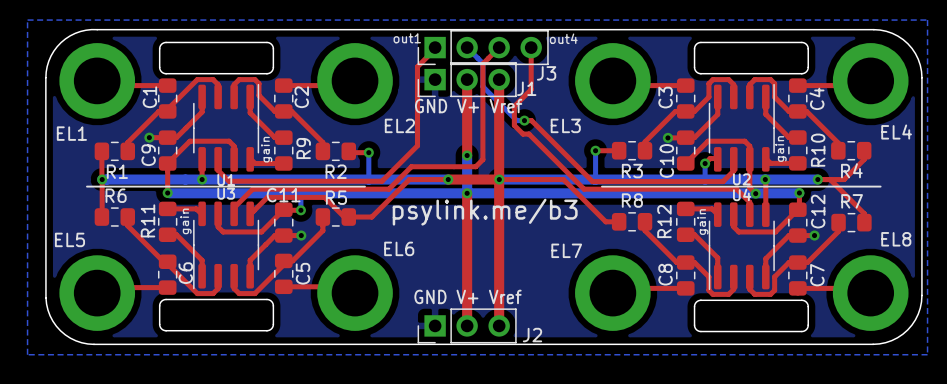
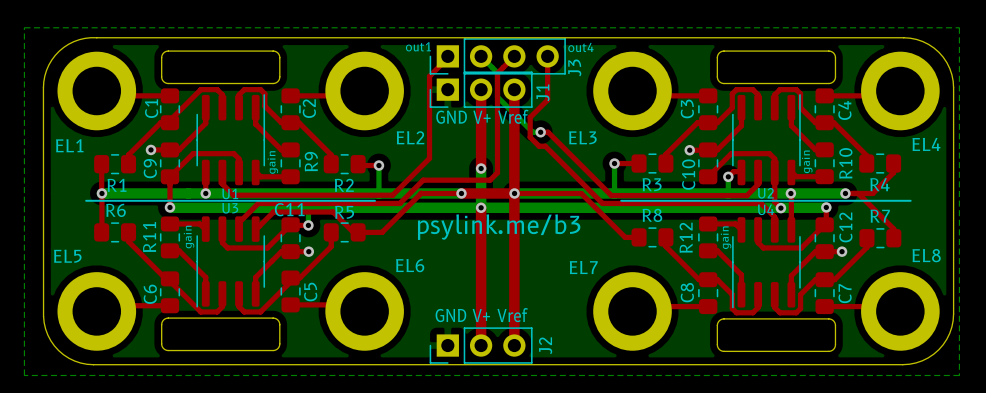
J3 name rotation: 0° (546, 73) -> 90° counterclockwise (574, 67)
J1 name rotation: 0° (526, 88) -> 90° counterclockwise (542, 92)
C6 name position: C6 (185, 273) -> C6 (150, 294)
J2 name rotation: 0° (532, 335) -> 90° counterclockwise (545, 345)

